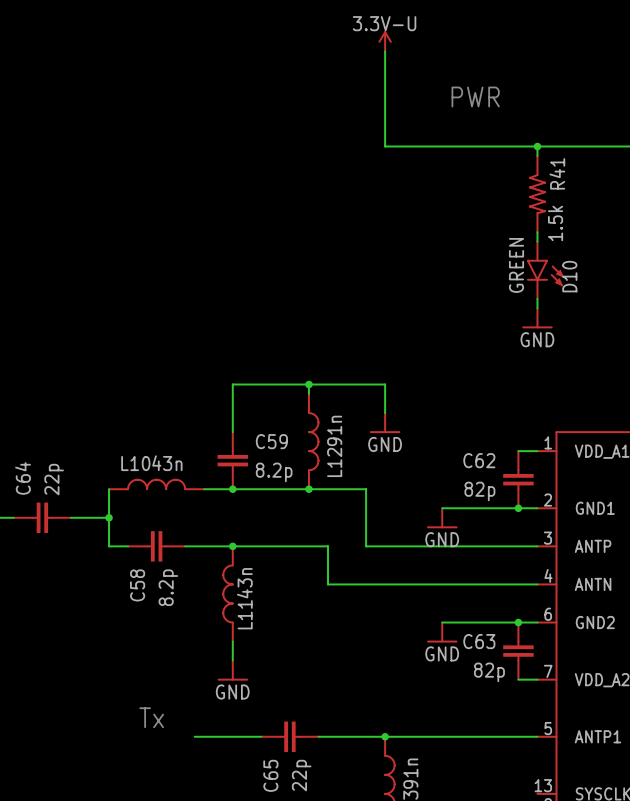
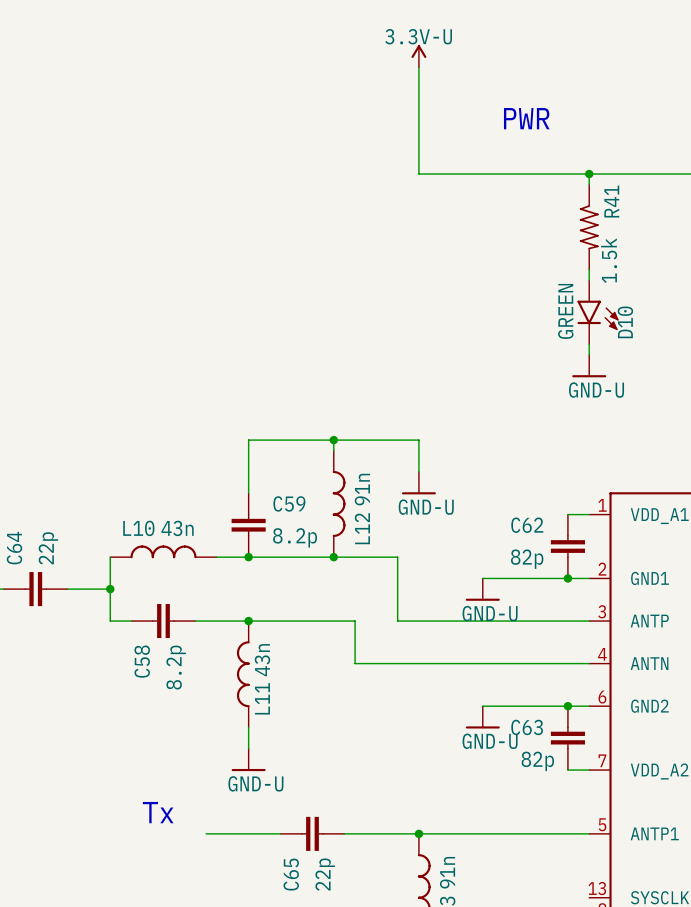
power symbol: GND (537, 318) -> GND-U (589, 366)
power symbol: GND (385, 423) -> GND-U (418, 483)
power symbol: GND (442, 518) -> GND-U (482, 589)
power symbol: GND (442, 632) -> GND-U (482, 717)
power symbol: GND (232, 670) -> GND-U (248, 759)

